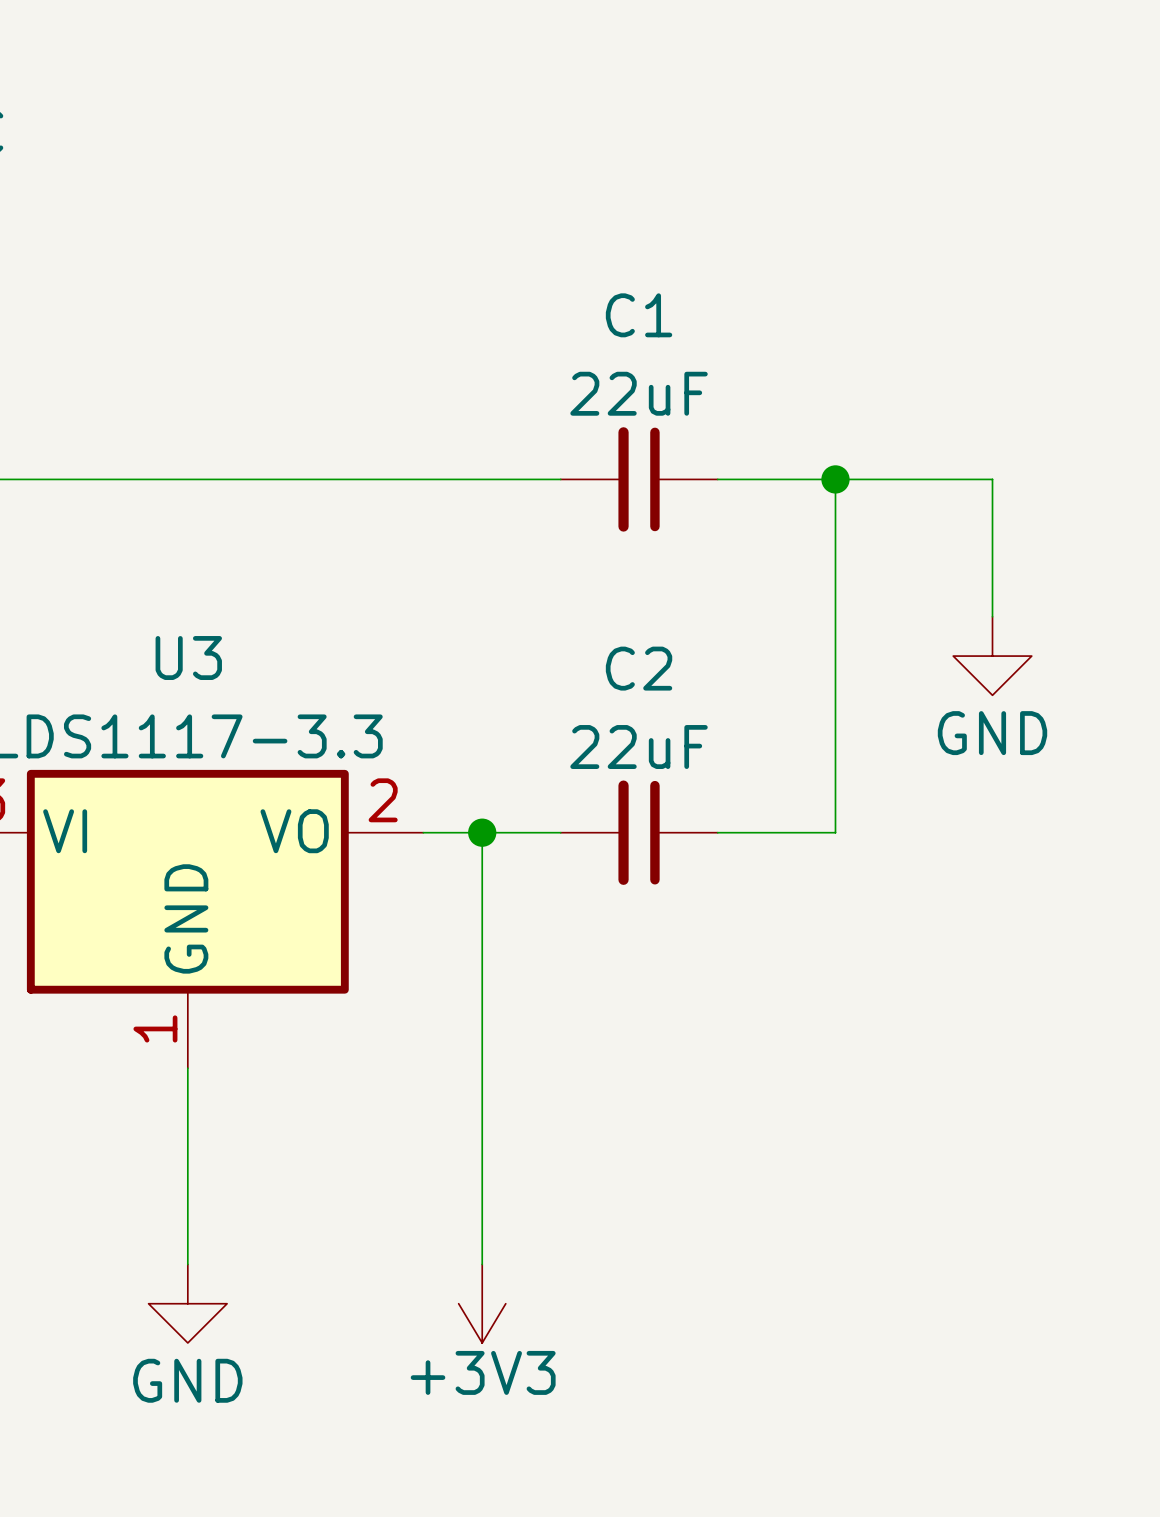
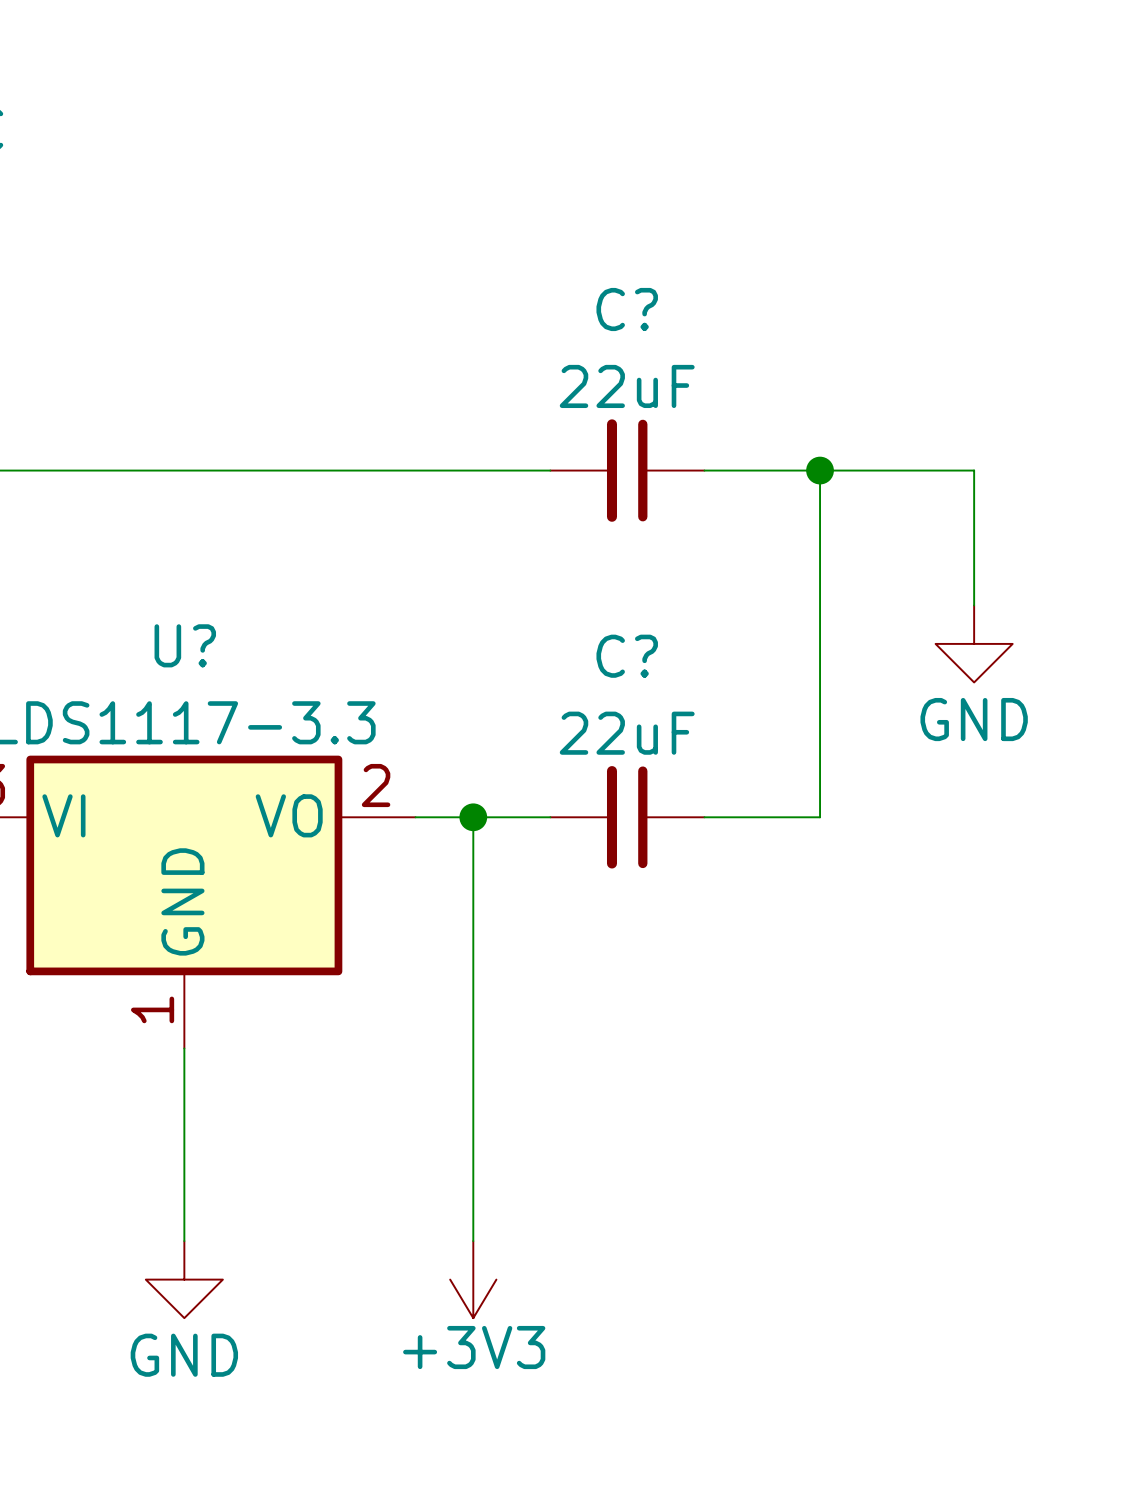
C1 name: C1 (639, 315) -> C? (627, 309)
U3 name: U3 (188, 658) -> U? (185, 645)
C2 name: C2 (639, 668) -> C? (627, 656)

